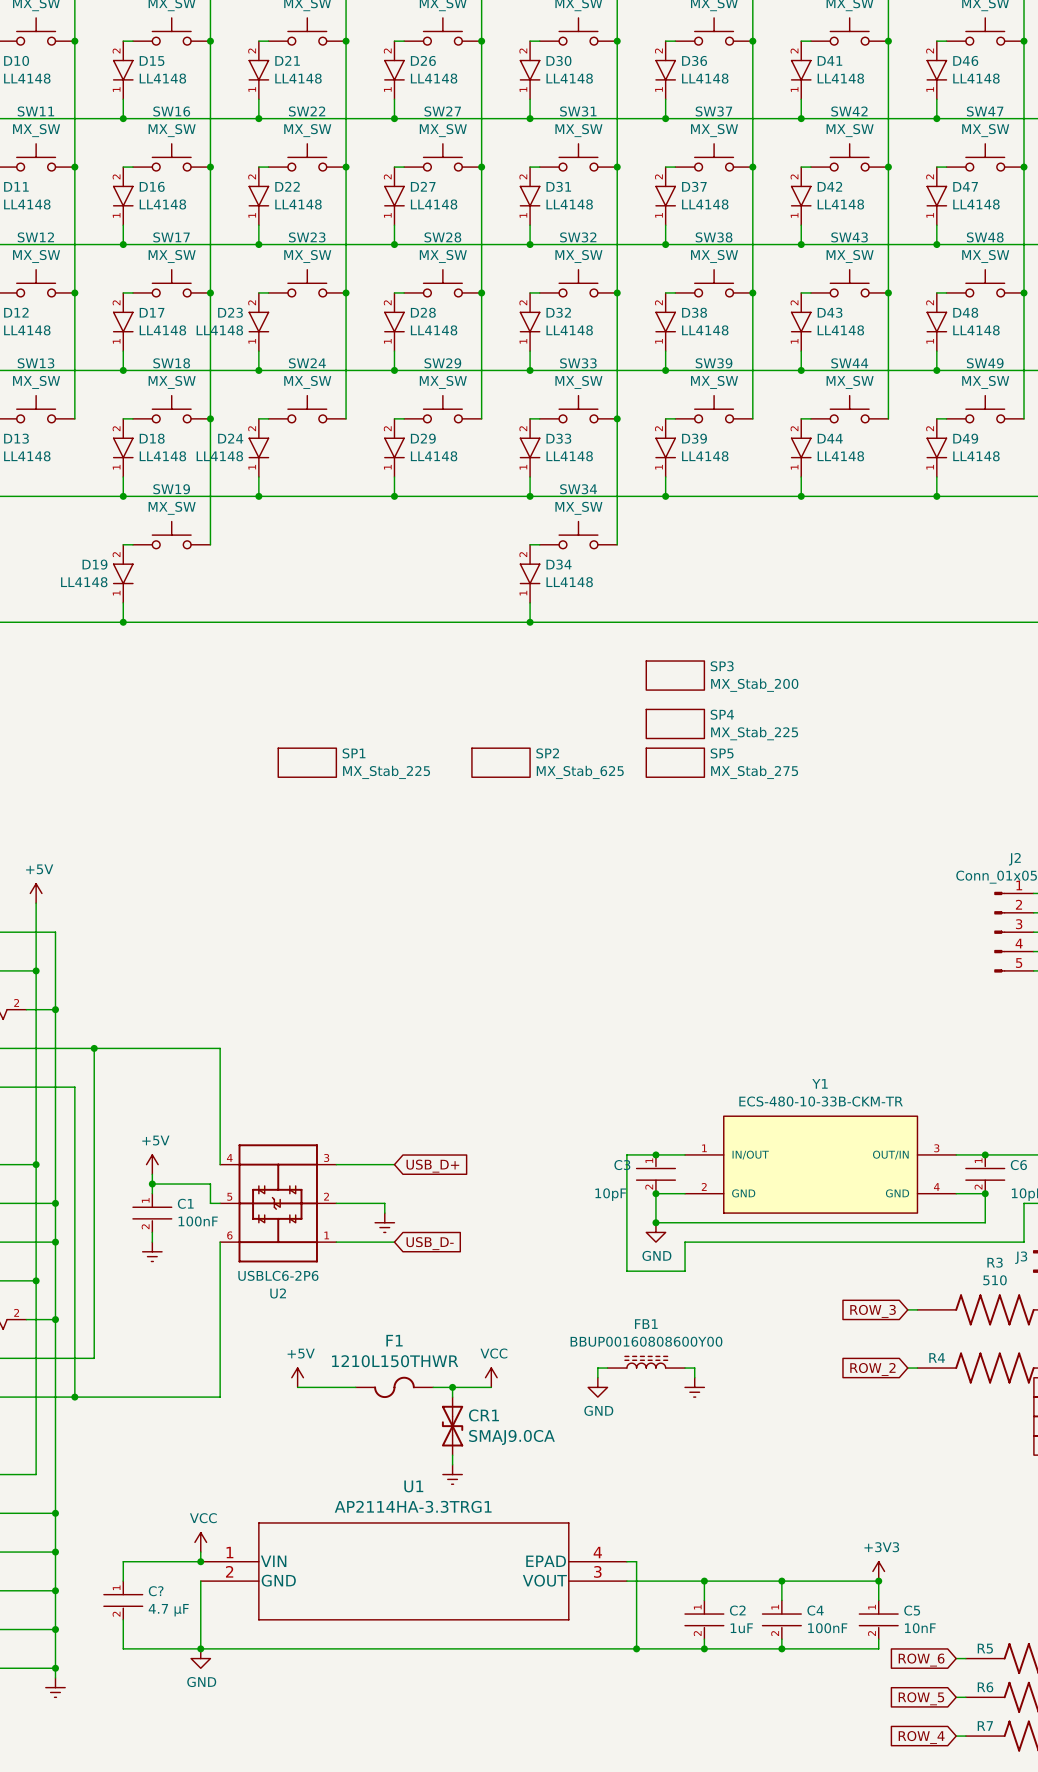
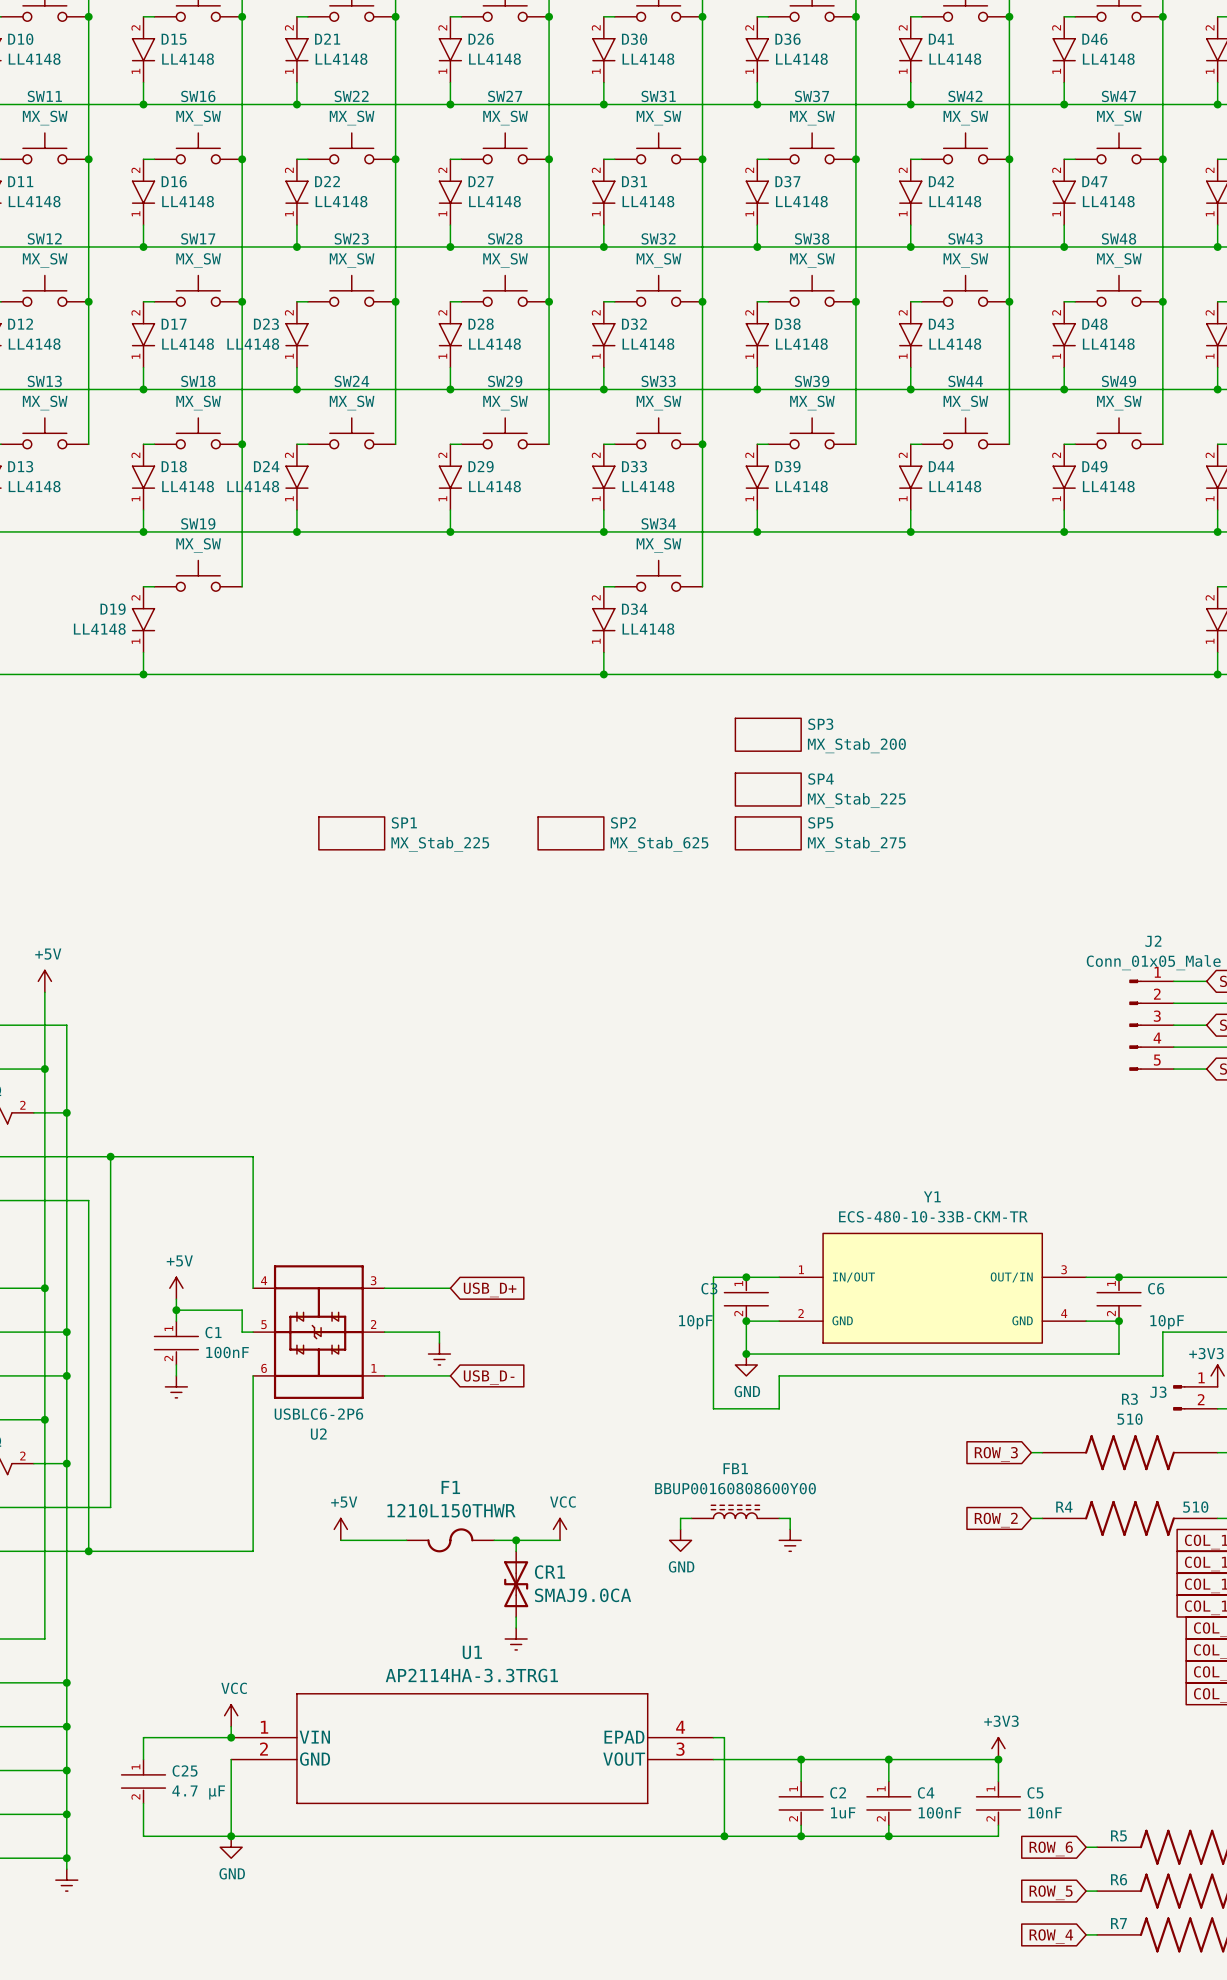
C? name: C? (156, 1591) -> C25 (185, 1770)

